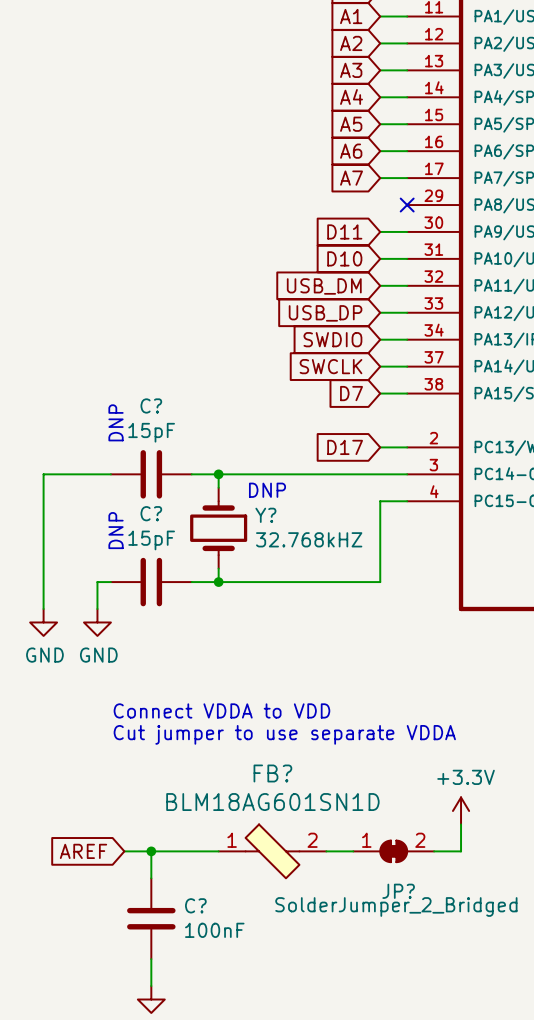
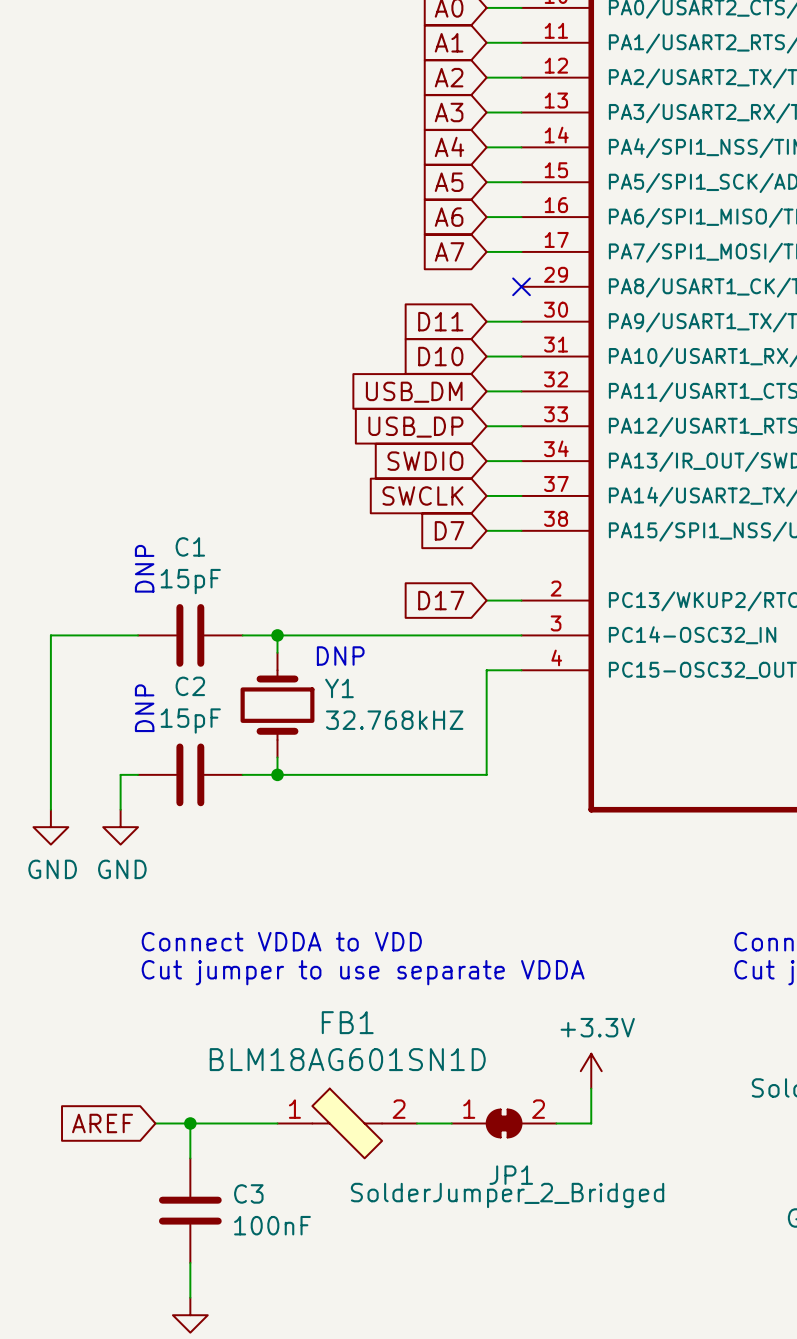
C? name: C? (151, 405) -> C1 (190, 546)
C? name: C? (151, 513) -> C2 (190, 686)
Y? name: Y? (265, 515) -> Y1 (339, 688)
FB? name: FB? (272, 773) -> FB1 (347, 1022)
JP? name: JP? (398, 891) -> JP1 (511, 1175)
C? name: C? (195, 905) -> C3 (248, 1193)

